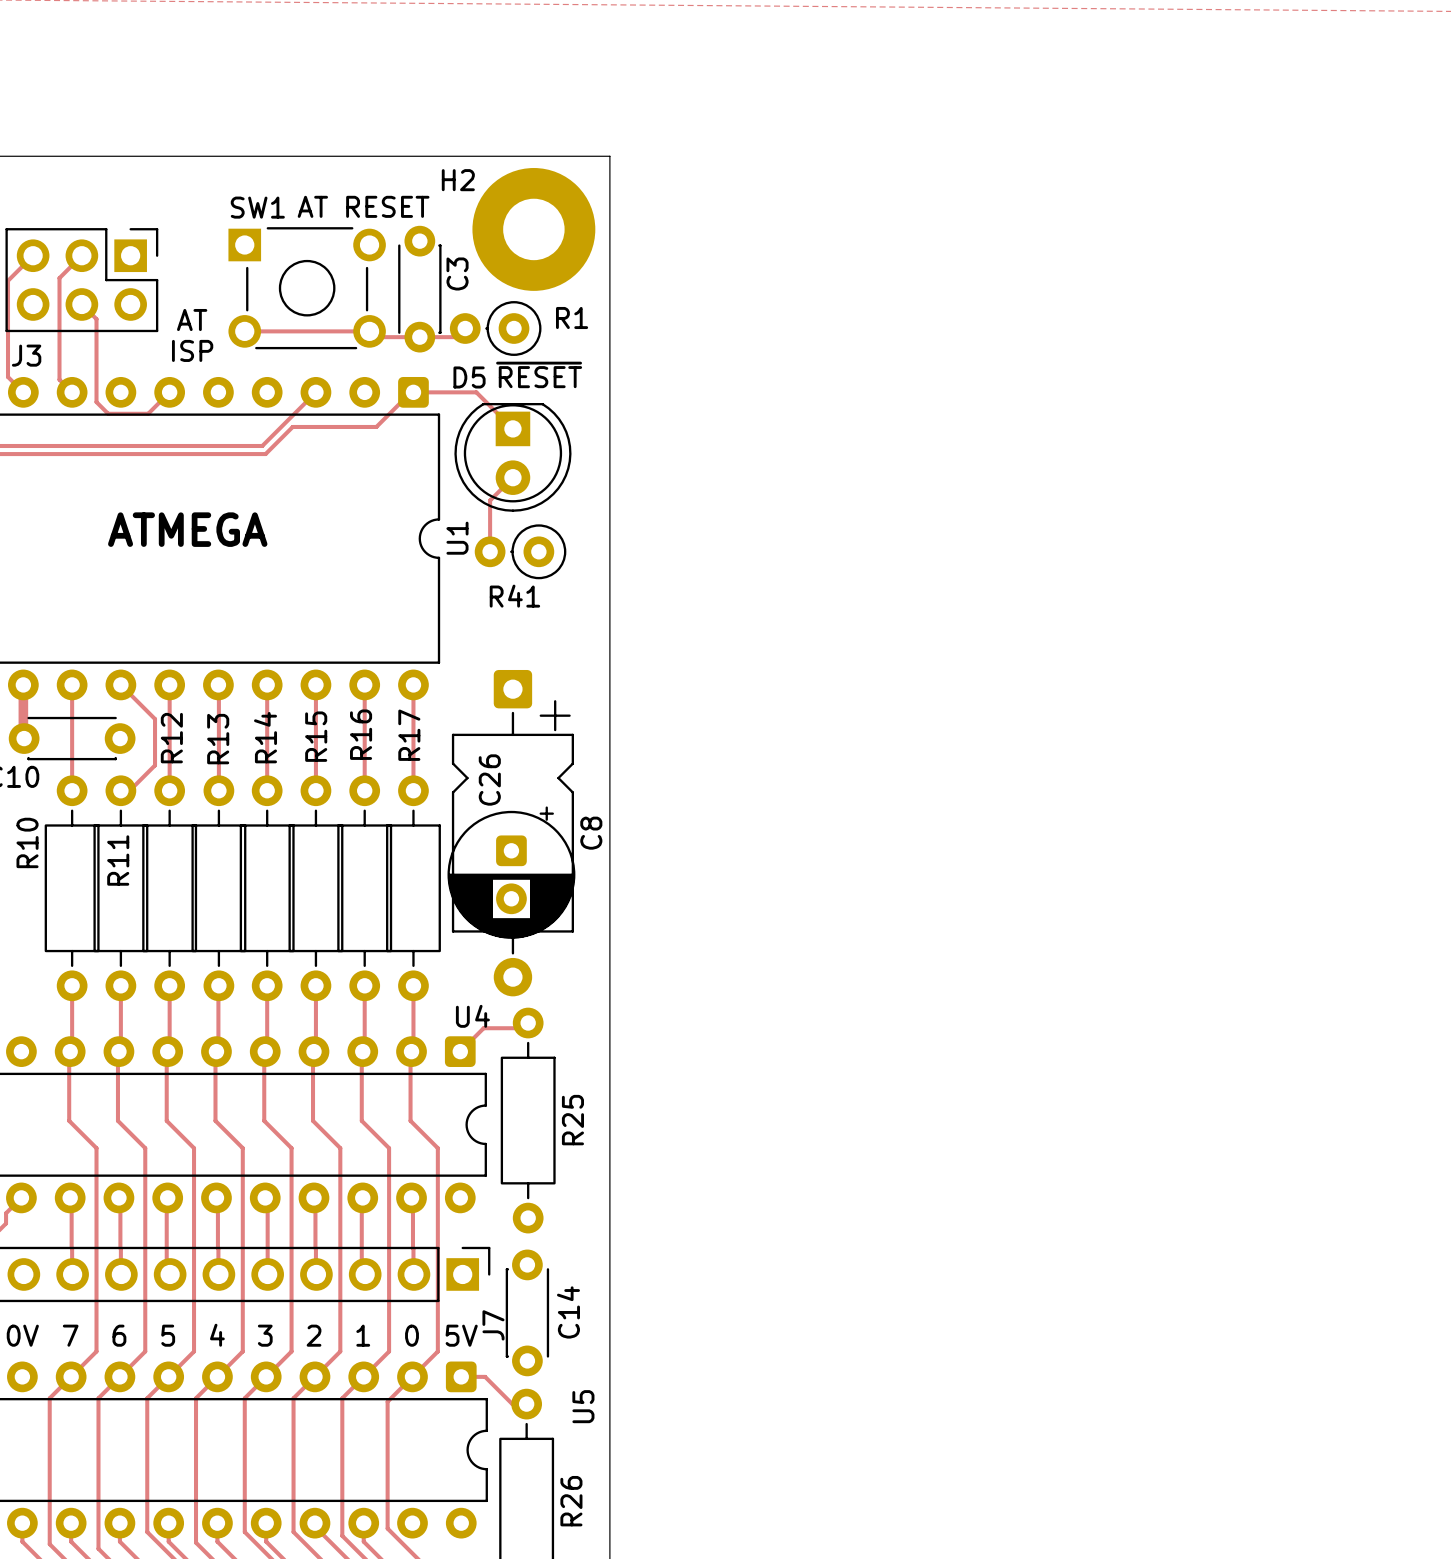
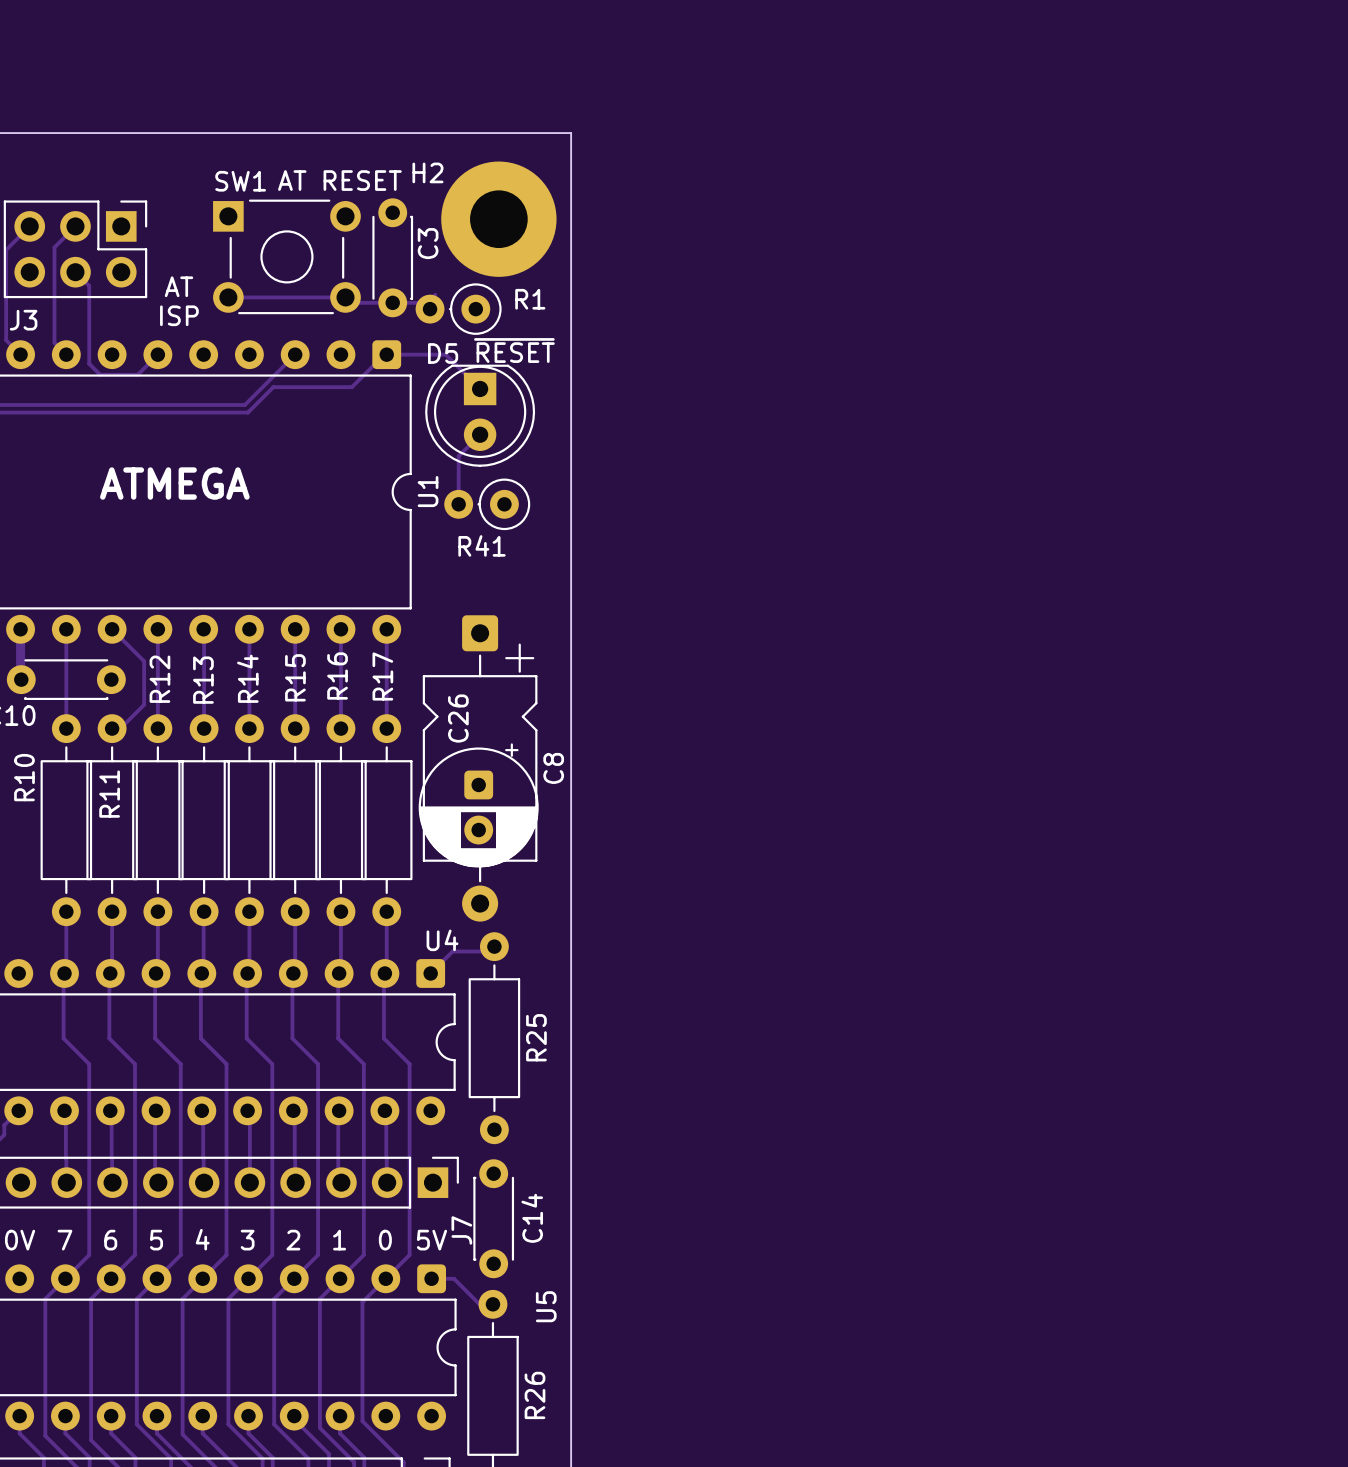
H2 position: (533, 229) -> (498, 219)
R1 position: (495, 328) -> (458, 309)
text position: ~{RESET} (539, 374) -> ~{RESET} (514, 350)
D5 name position: D5 (469, 377) -> D5 (443, 353)

